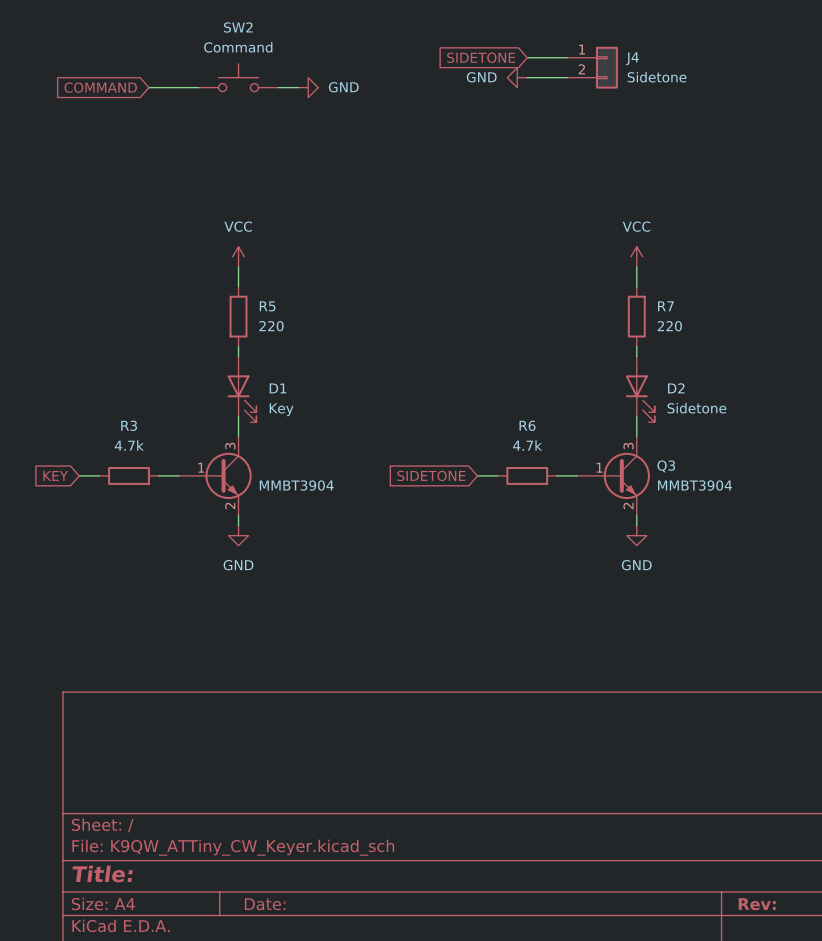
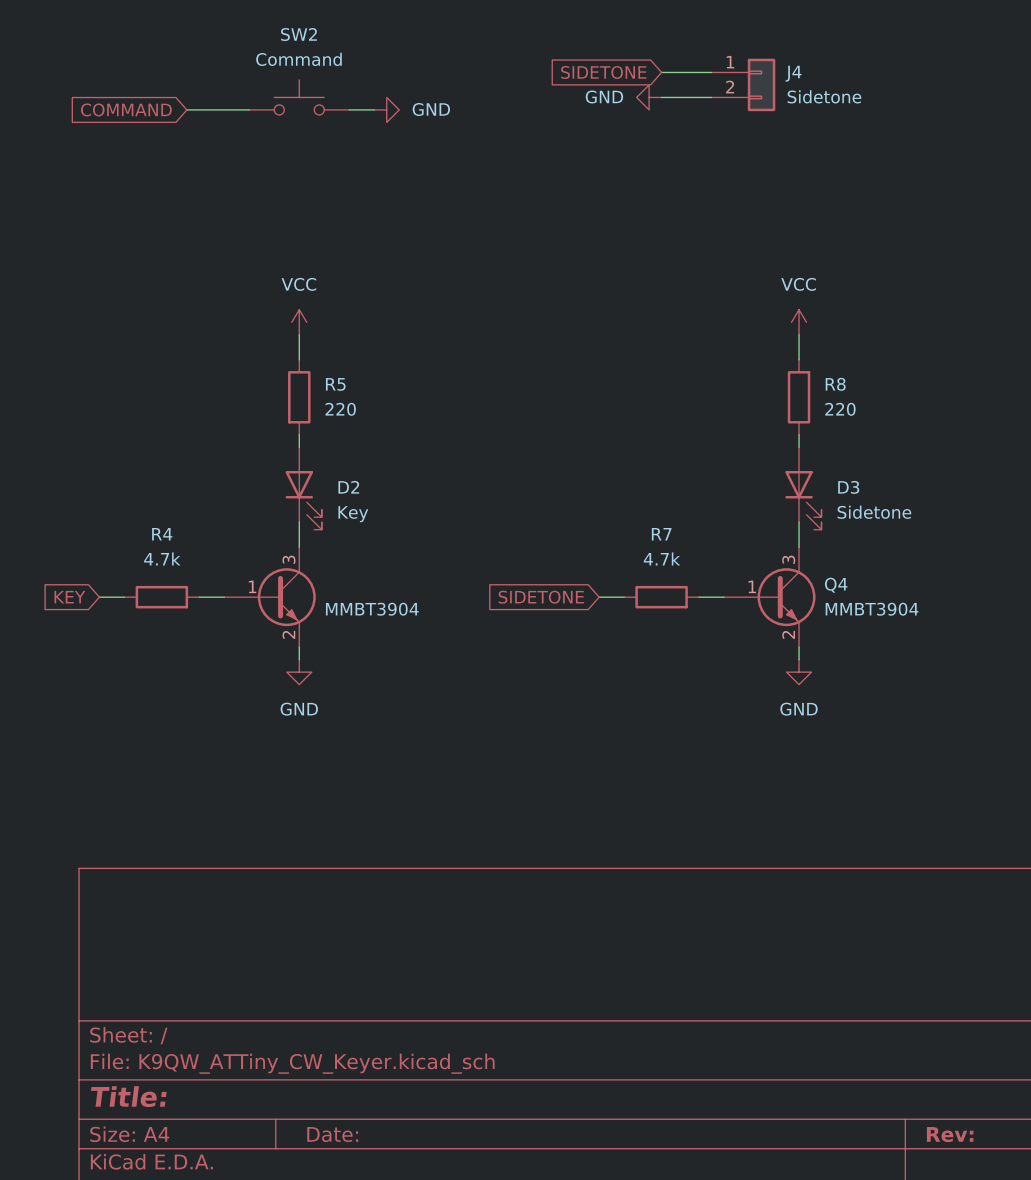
R7 name: R7 (665, 306) -> R8 (835, 384)
D1 name: D1 (278, 388) -> D2 (348, 487)
D2 name: D2 (676, 388) -> D3 (848, 487)
R3 name: R3 (129, 425) -> R4 (162, 534)
R6 name: R6 (527, 425) -> R7 (661, 534)
Q3 name: Q3 (666, 466) -> Q4 (836, 585)

